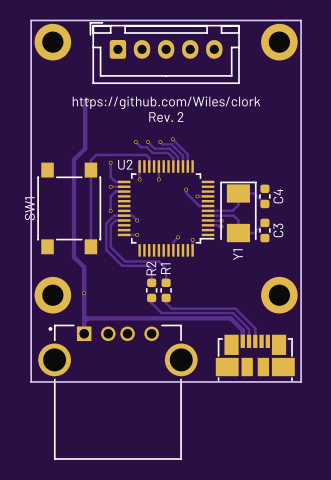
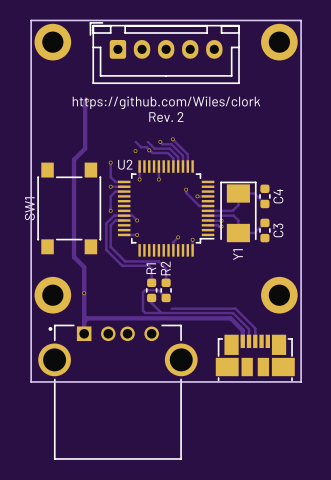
via: (135, 141) -> none
via: (147, 141) -> none
via: none -> (149, 150)
via: none -> (135, 151)
track: (149, 166) (149, 157) (146, 154) (96, 154) (90, 160) (90, 246) -> none
R2 name: R2 (151, 268) -> R1 (151, 268)
R1 name: R1 (165, 268) -> R2 (165, 268)
track: (166, 297) (166, 303) (171, 308) -> (166, 297) (158, 290) (145, 290) (142, 292) (142, 310) (145, 313) (161, 313)

